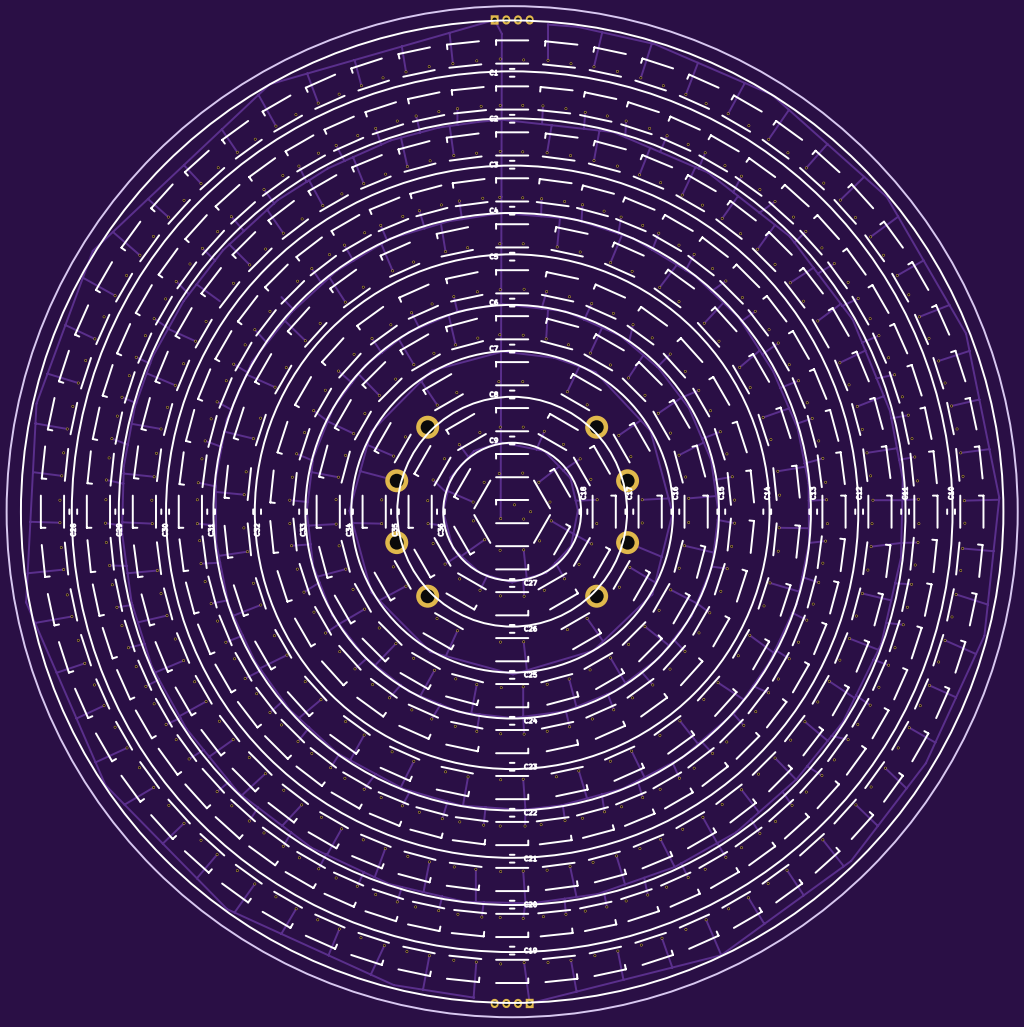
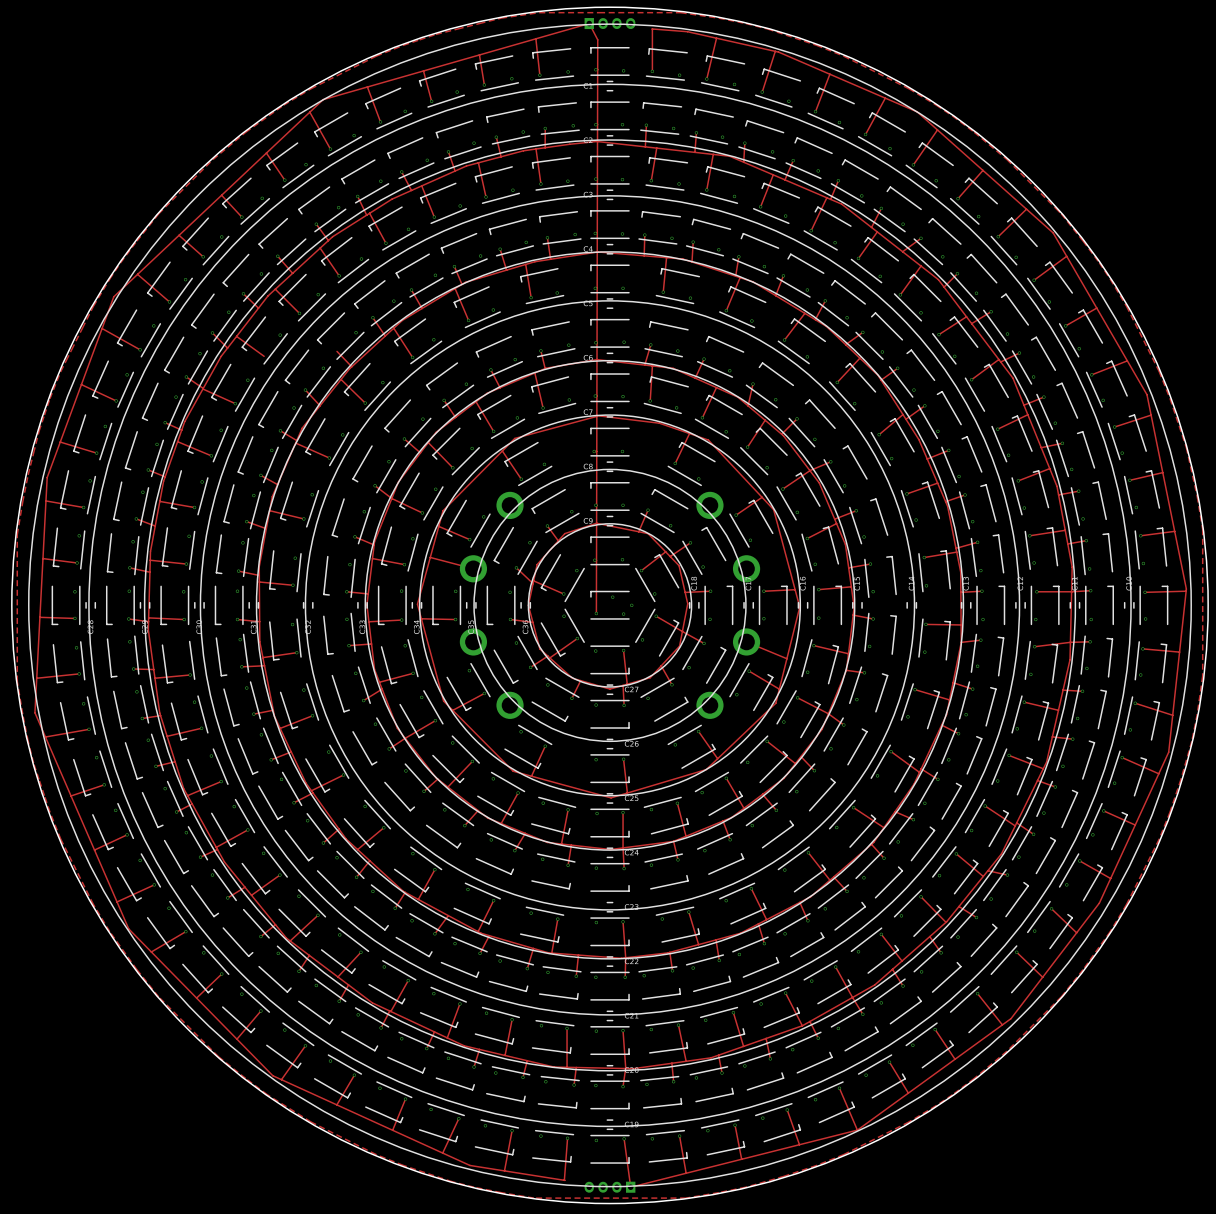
zone outline: none -> (539, 12) (501, 18) (435, 34) (376, 56) (310, 88) (283, 105) (245, 132) (213, 159) (158, 213) (136, 241) (120, 262) (93, 306) (60, 371) (39, 431) (28, 474) (17, 534) (17, 681) (28, 741) (49, 812) (60, 839) (93, 904) (109, 931) (158, 996) (218, 1056) (245, 1078) (267, 1094) (310, 1121) (376, 1154) (452, 1181) (533, 1198) (686, 1198) (745, 1187) (816, 1165) (843, 1154) (909, 1121) (952, 1094) (1006, 1051) (1061, 996) (1083, 969) (1110, 931) (1126, 904) (1159, 839) (1170, 812) (1191, 741) (1202, 676) (1202, 529) (1186, 447) (1170, 398) (1159, 371) (1126, 306) (1099, 262) (1061, 213) (1006, 159) (974, 132) (952, 115) (909, 88) (843, 56) (767, 28) (718, 18) (680, 12) (539, 12)

